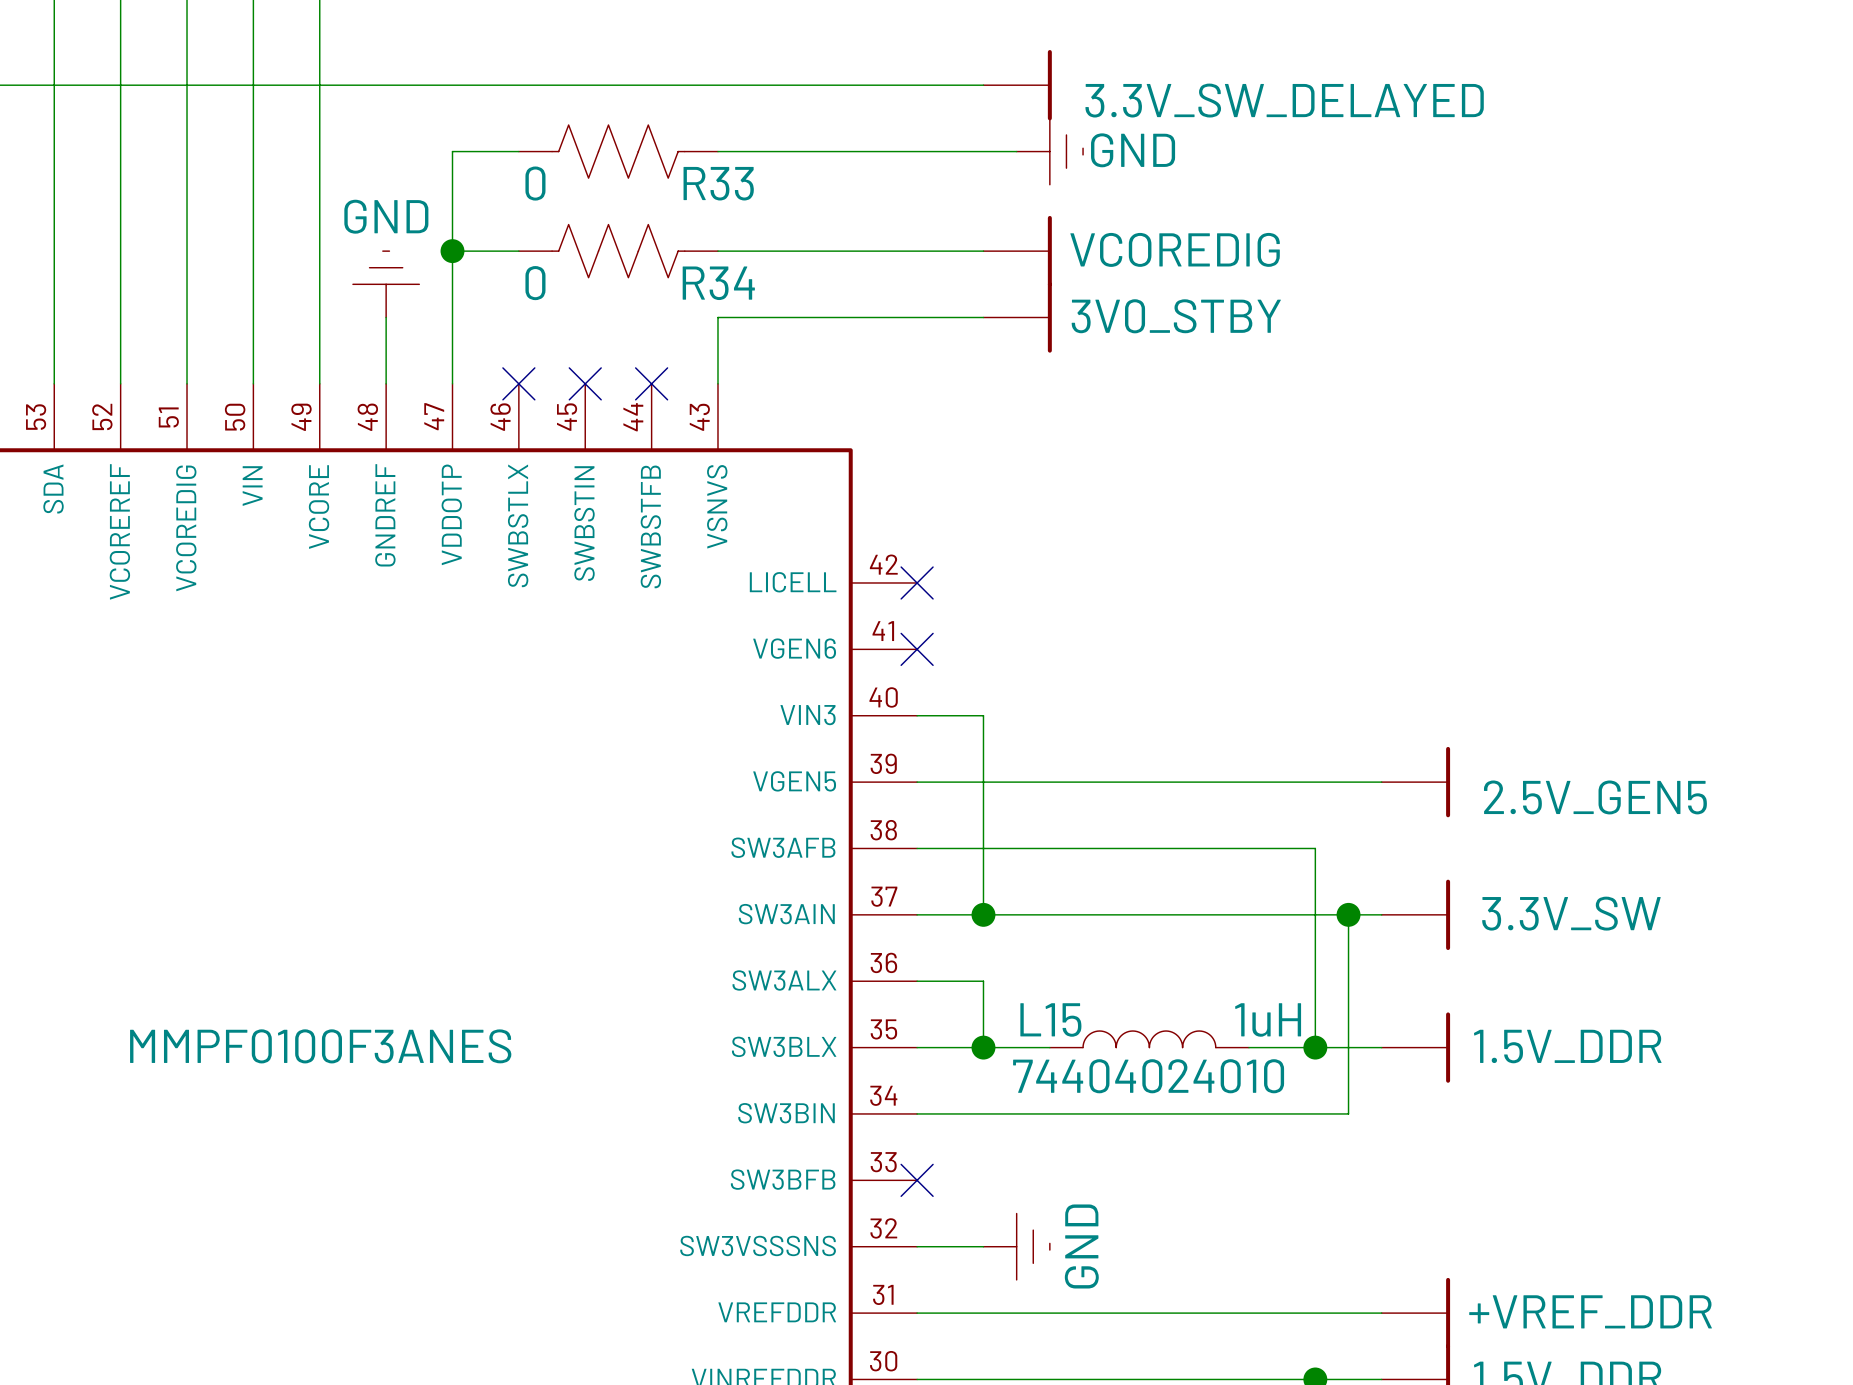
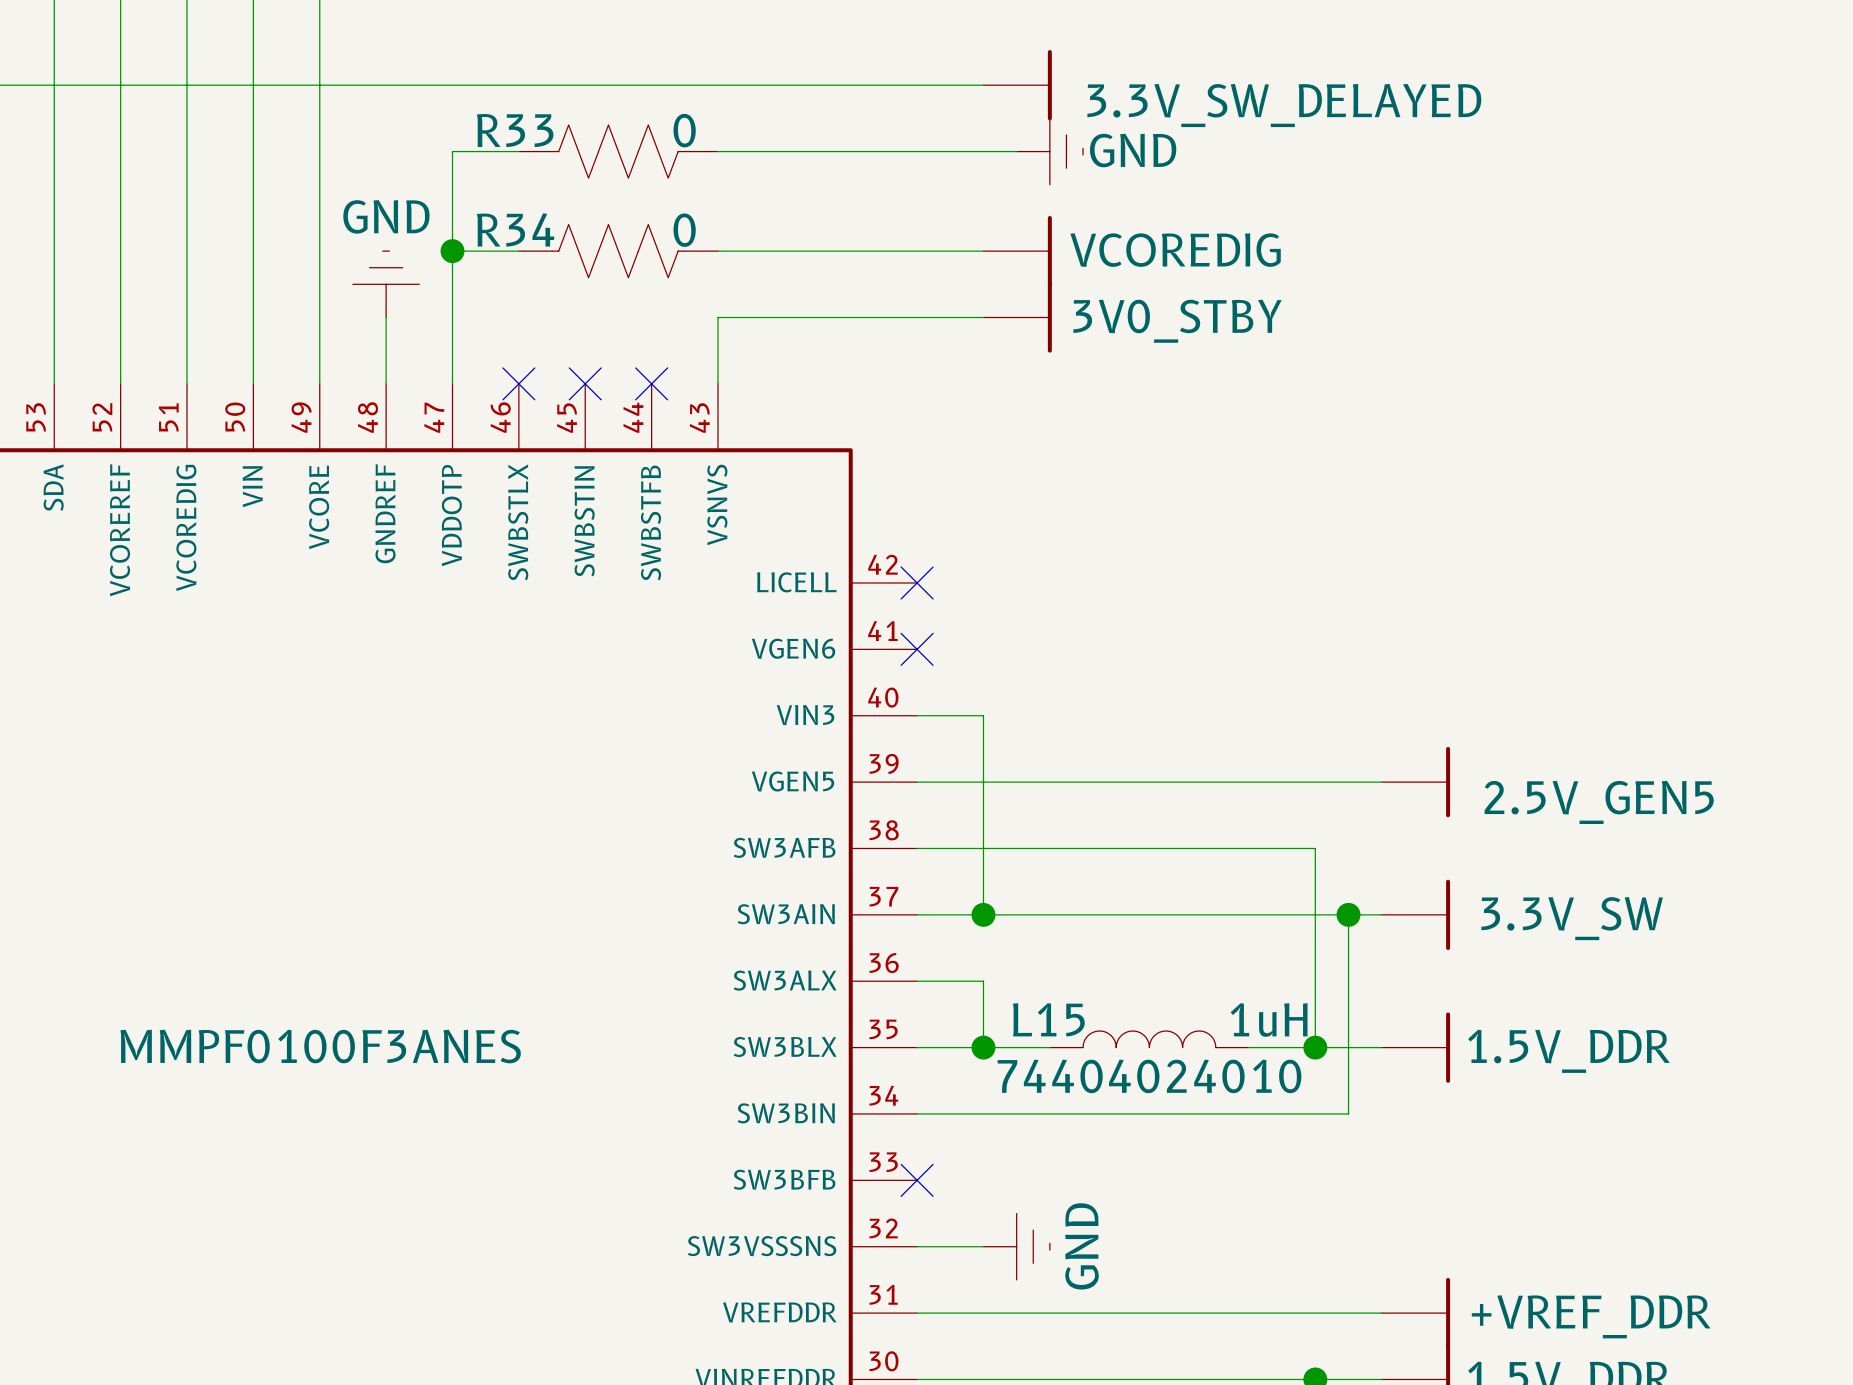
R33 value position: 0 (535, 183) -> 0 (684, 130)
R33 name position: R33 (718, 183) -> R33 (515, 130)
R34 value position: 0 (535, 283) -> 0 (684, 230)
R34 name position: R34 (718, 283) -> R34 (515, 229)

